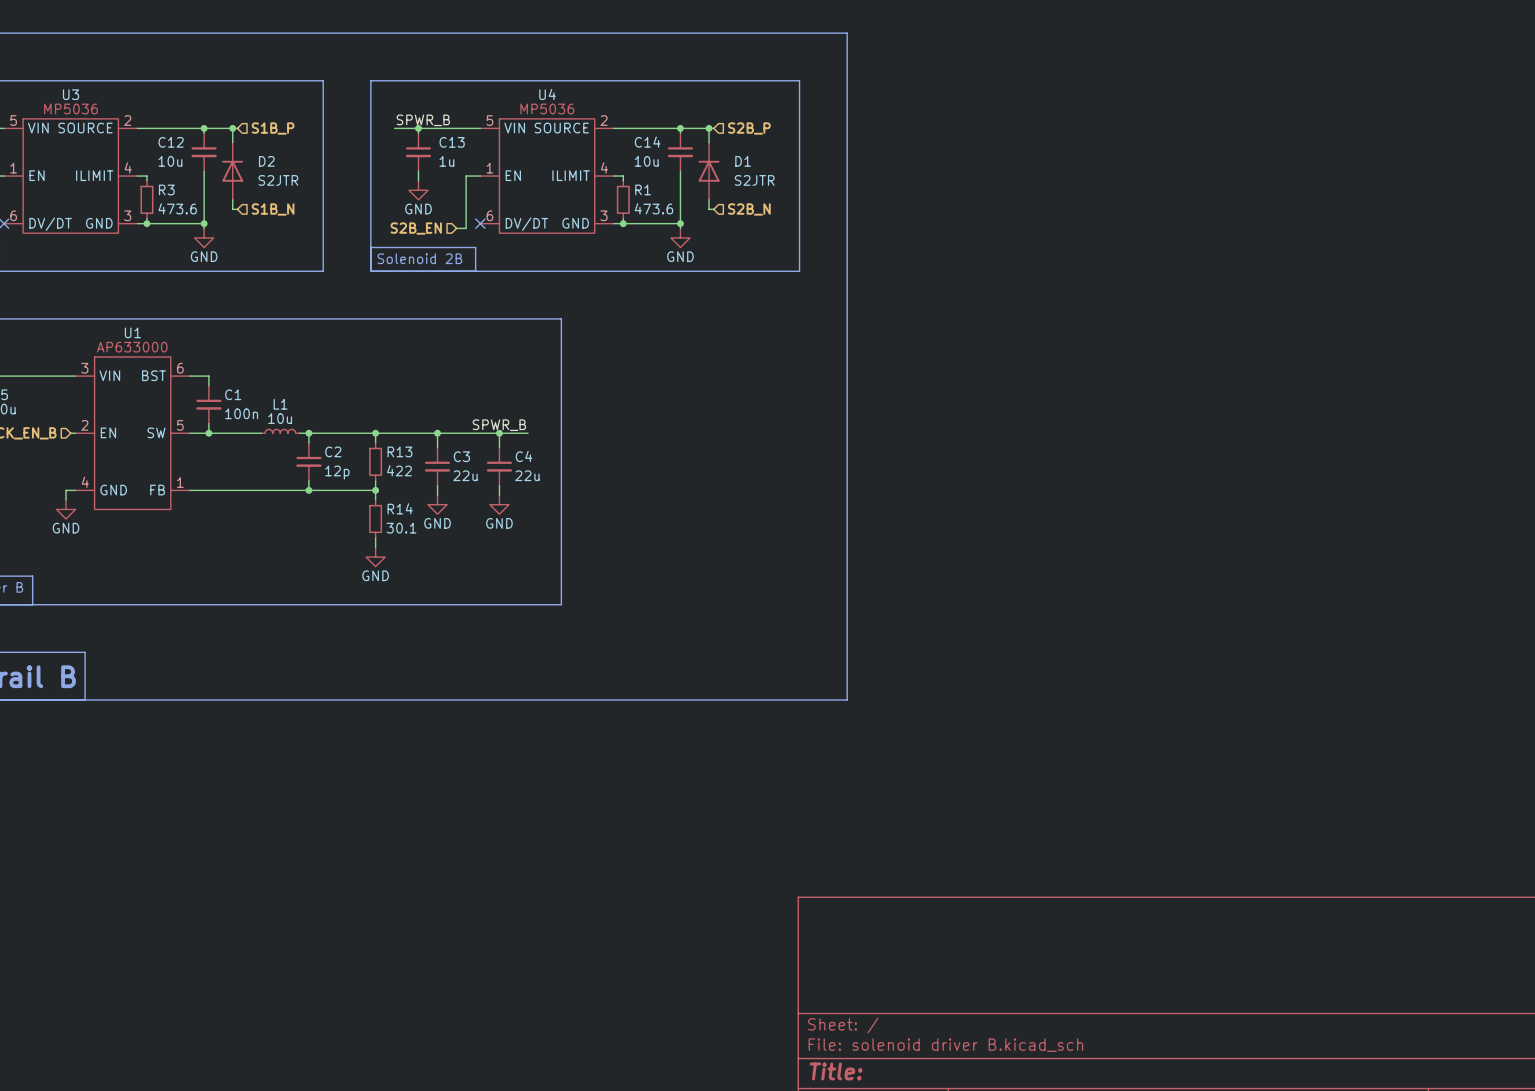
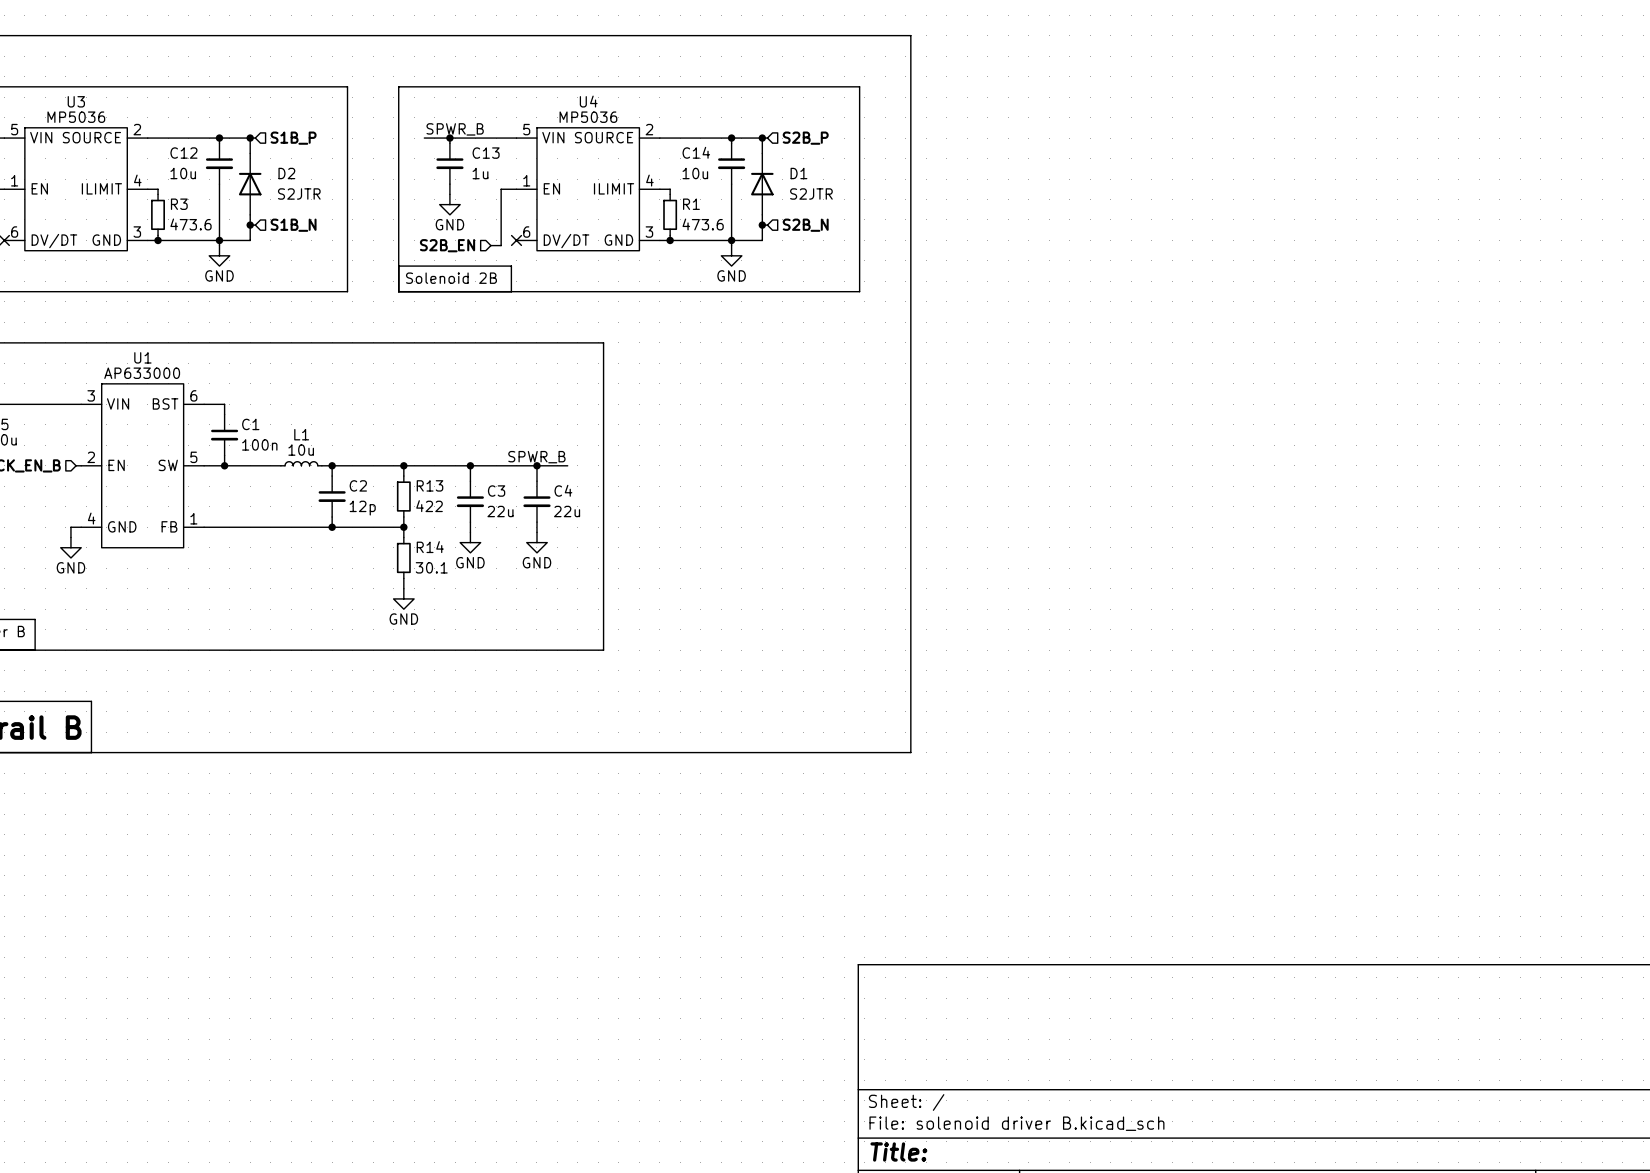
wire: none -> (250, 225) (250, 240) (219, 240)
junction: none -> (250, 225)
wire: none -> (762, 225) (762, 240) (731, 240)
junction: none -> (762, 225)

